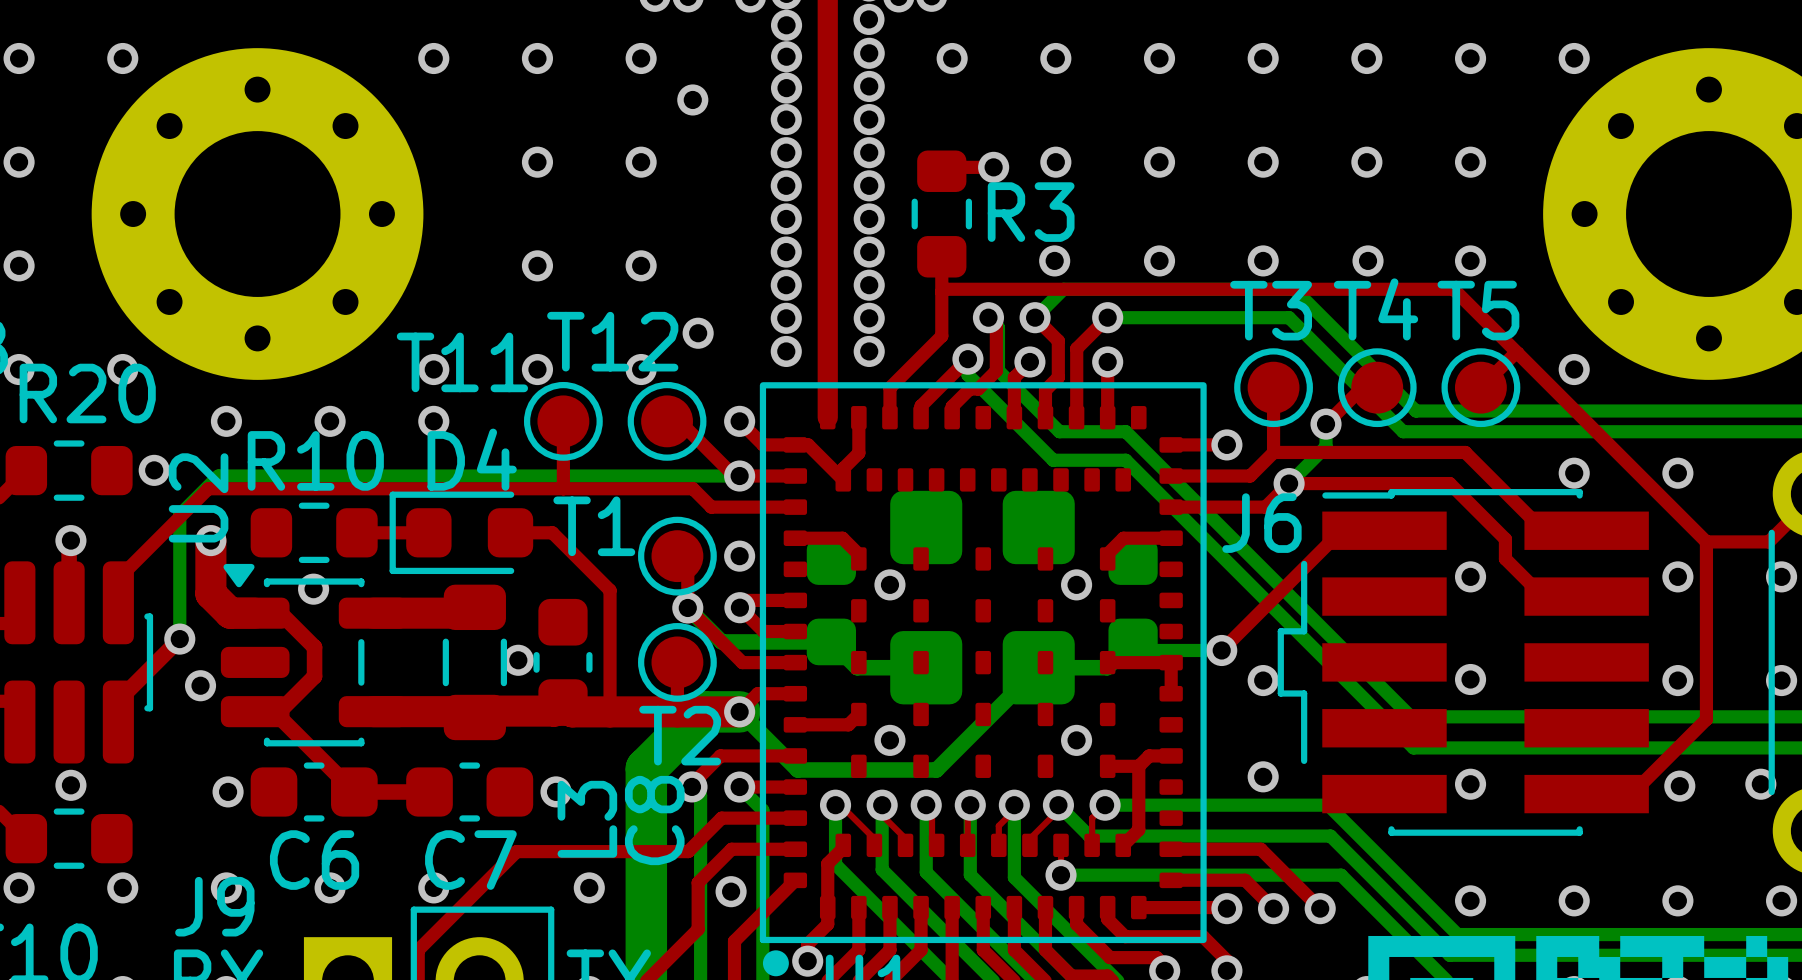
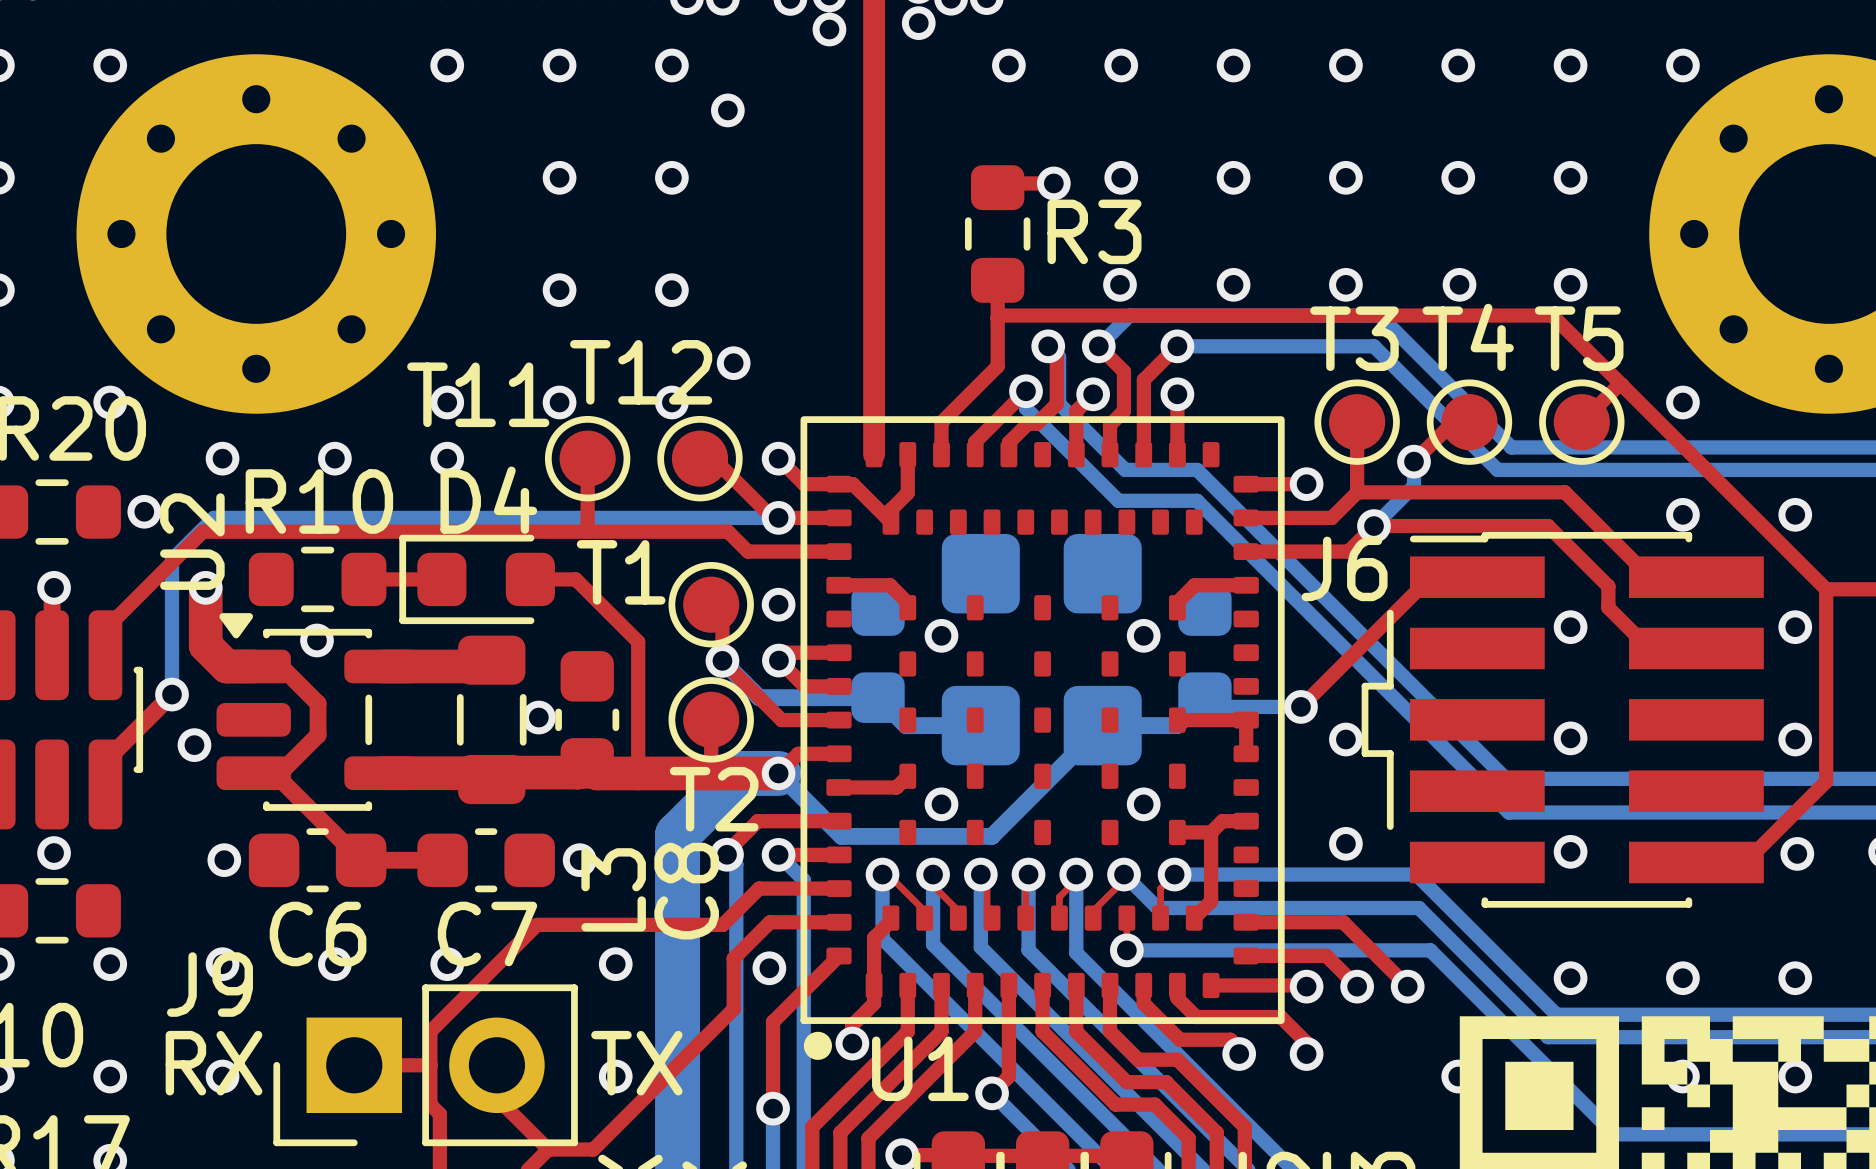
via: (869, 53) -> none
via: (786, 56) -> none
via: (869, 86) -> none
via: (786, 88) -> none
via: (786, 119) -> none
via: (869, 119) -> none
via: (786, 152) -> none
via: (869, 152) -> none
via: (786, 185) -> none
via: (869, 185) -> none
via: (786, 218) -> none
via: (869, 218) -> none
via: (786, 252) -> none
via: (869, 252) -> none
via: (786, 285) -> none
via: (869, 285) -> none
via: (786, 318) -> none
via: (869, 318) -> none
via: (786, 351) -> none
via: (869, 351) -> none

